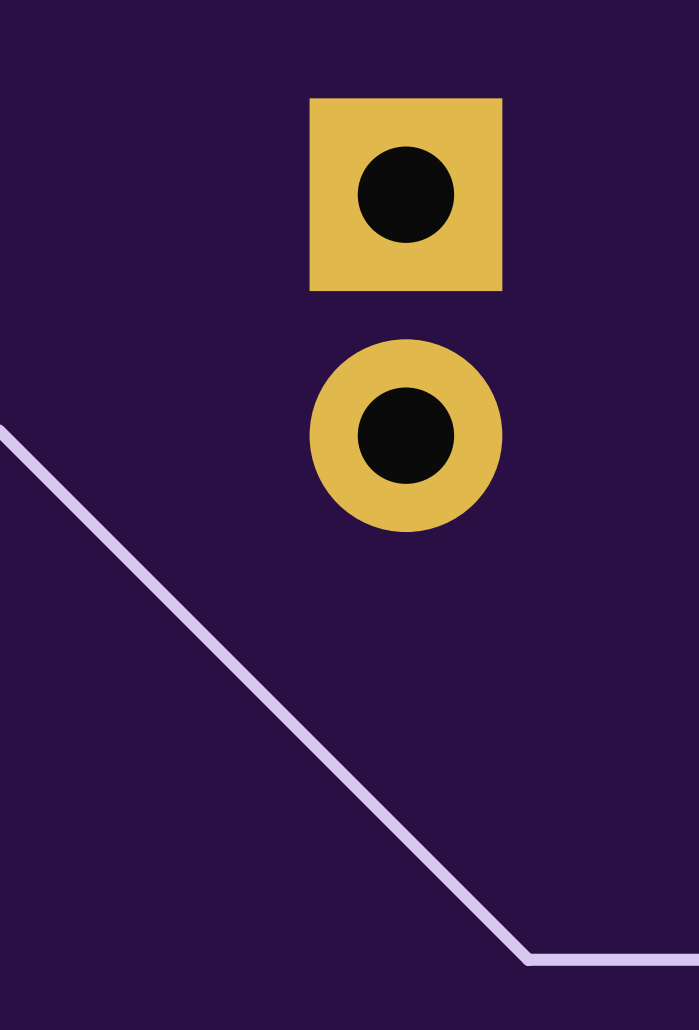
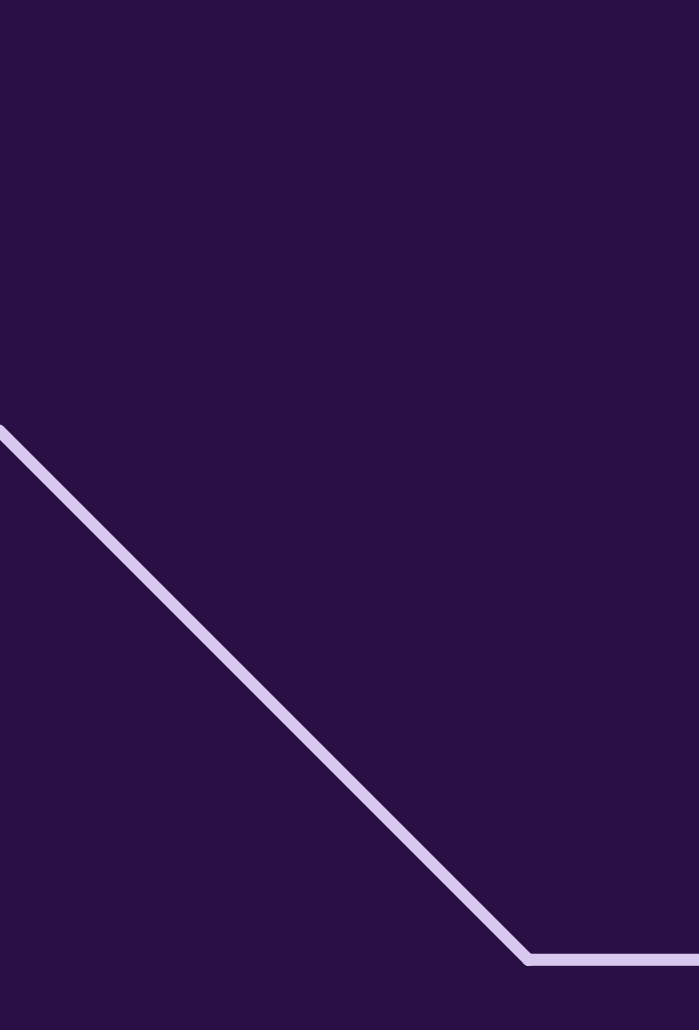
part: (405, 315) -> none

